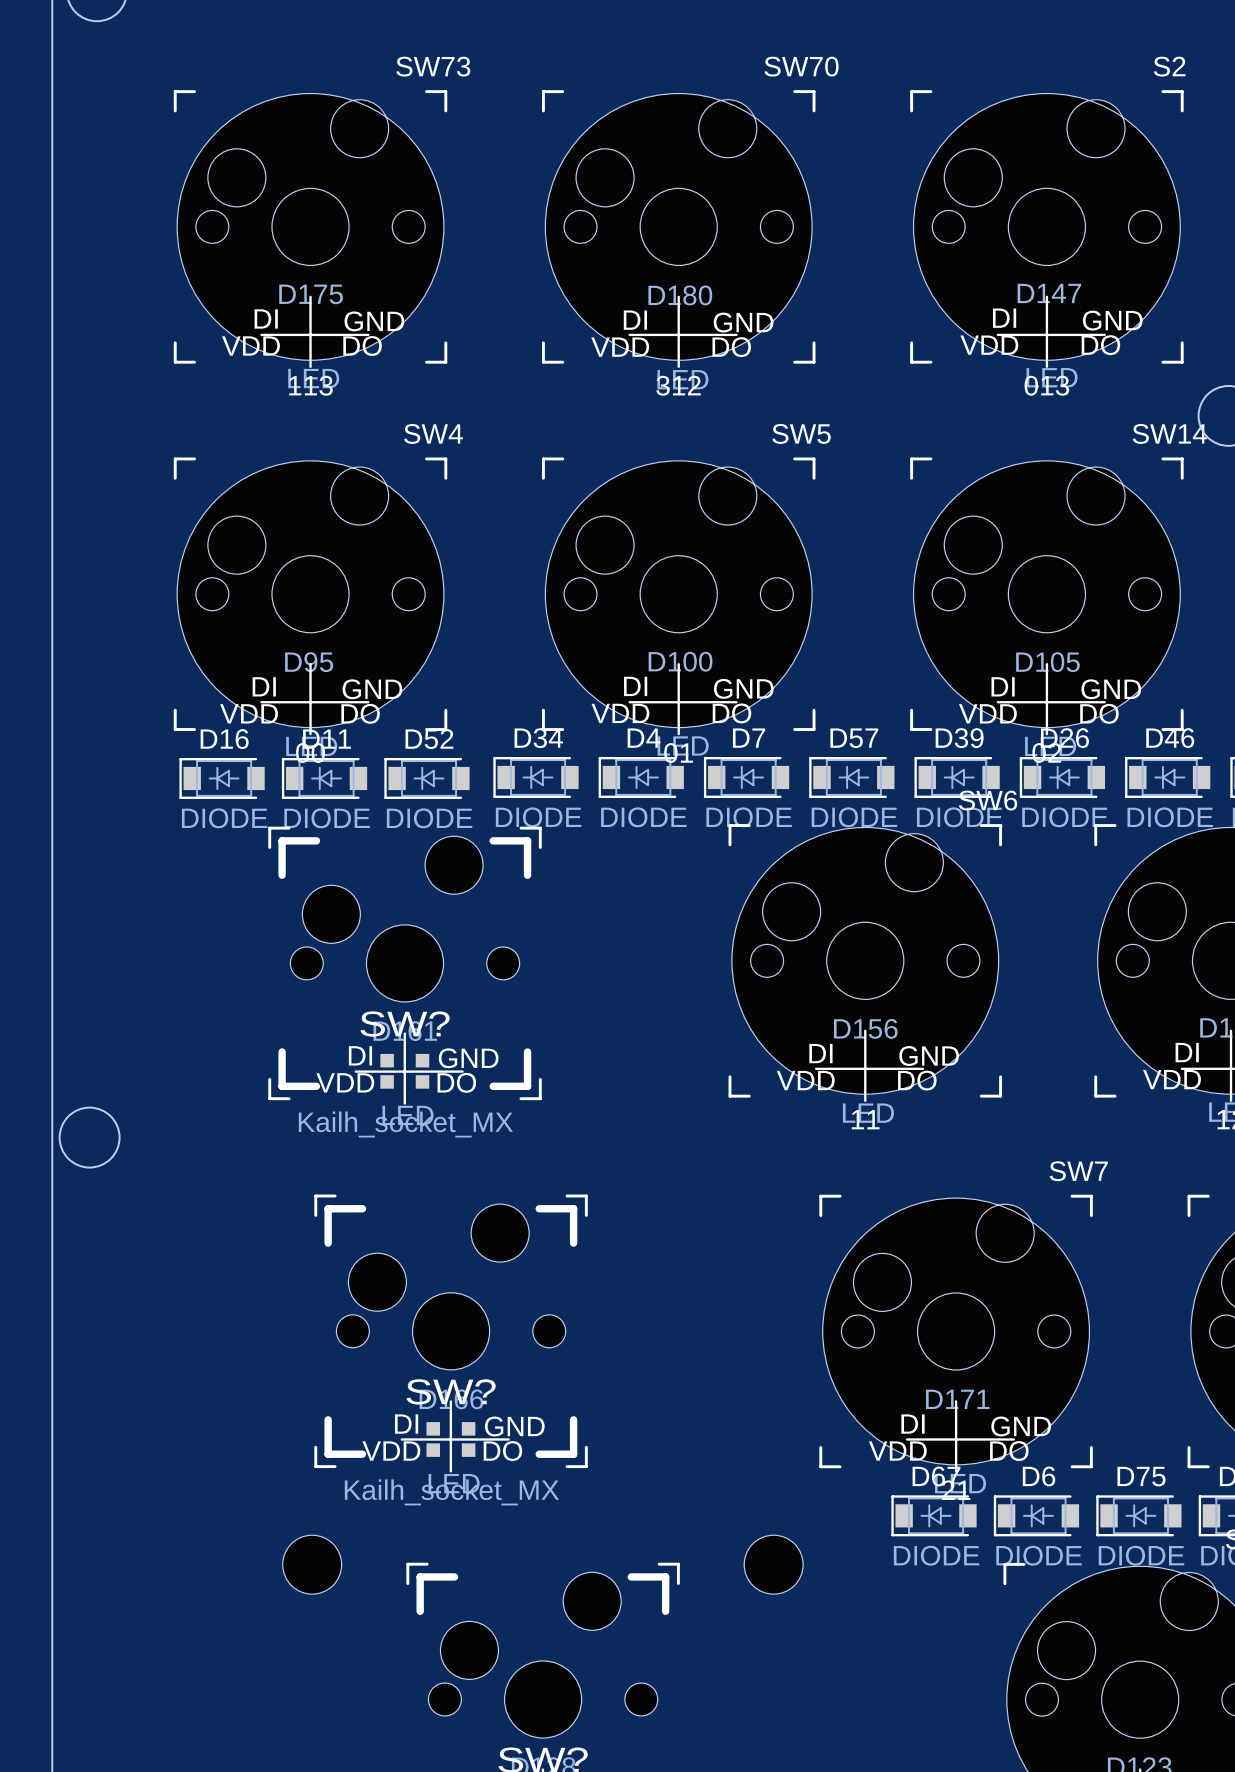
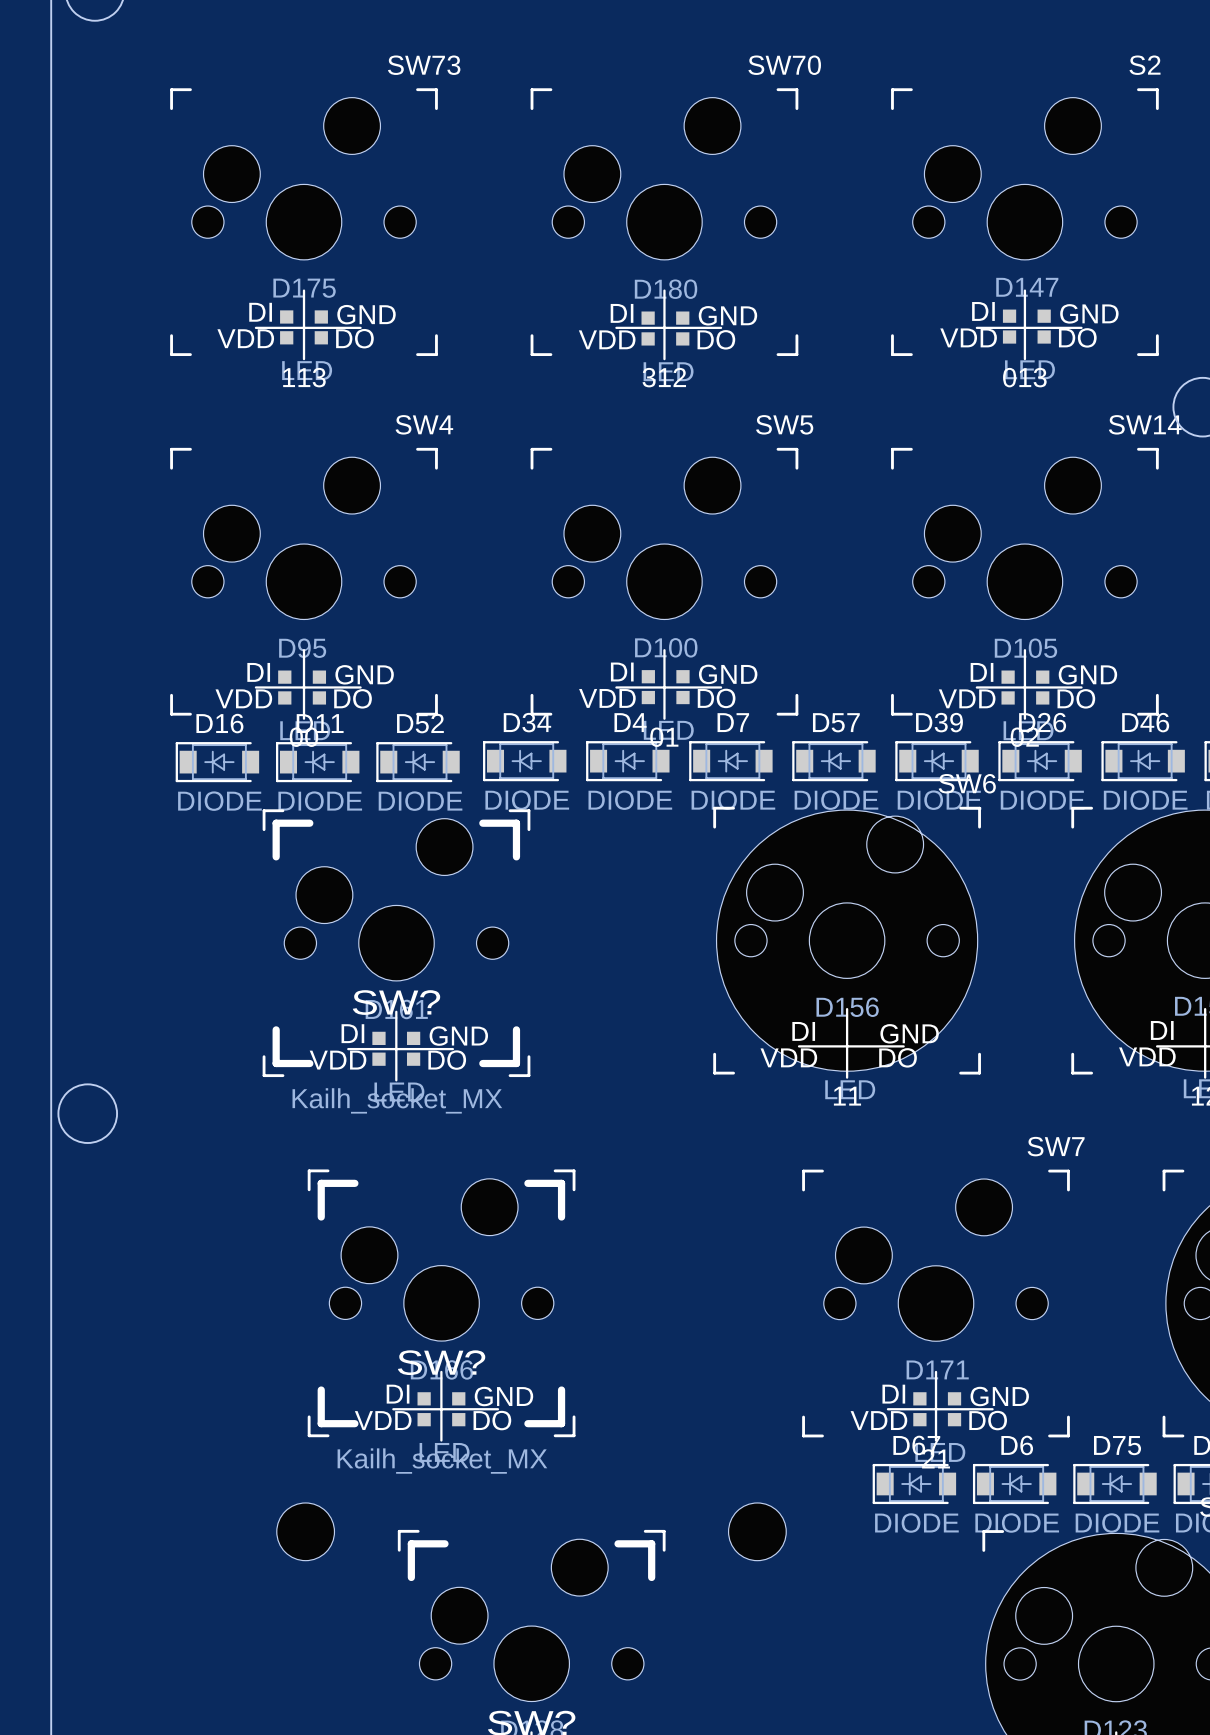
SW73 footprint: [173, 90, 448, 368] -> [170, 88, 438, 361]
SW70 footprint: [541, 90, 816, 368] -> [530, 88, 799, 361]
S2 footprint: [910, 90, 1184, 368] -> [891, 88, 1159, 361]
SW4 footprint: [173, 457, 448, 736] -> [170, 447, 438, 720]
SW5 footprint: [541, 457, 816, 736] -> [530, 447, 799, 720]
SW14 footprint: [910, 457, 1184, 736] -> [891, 447, 1159, 720]
SW7 footprint: [819, 1194, 1093, 1473] -> [802, 1169, 1070, 1442]

